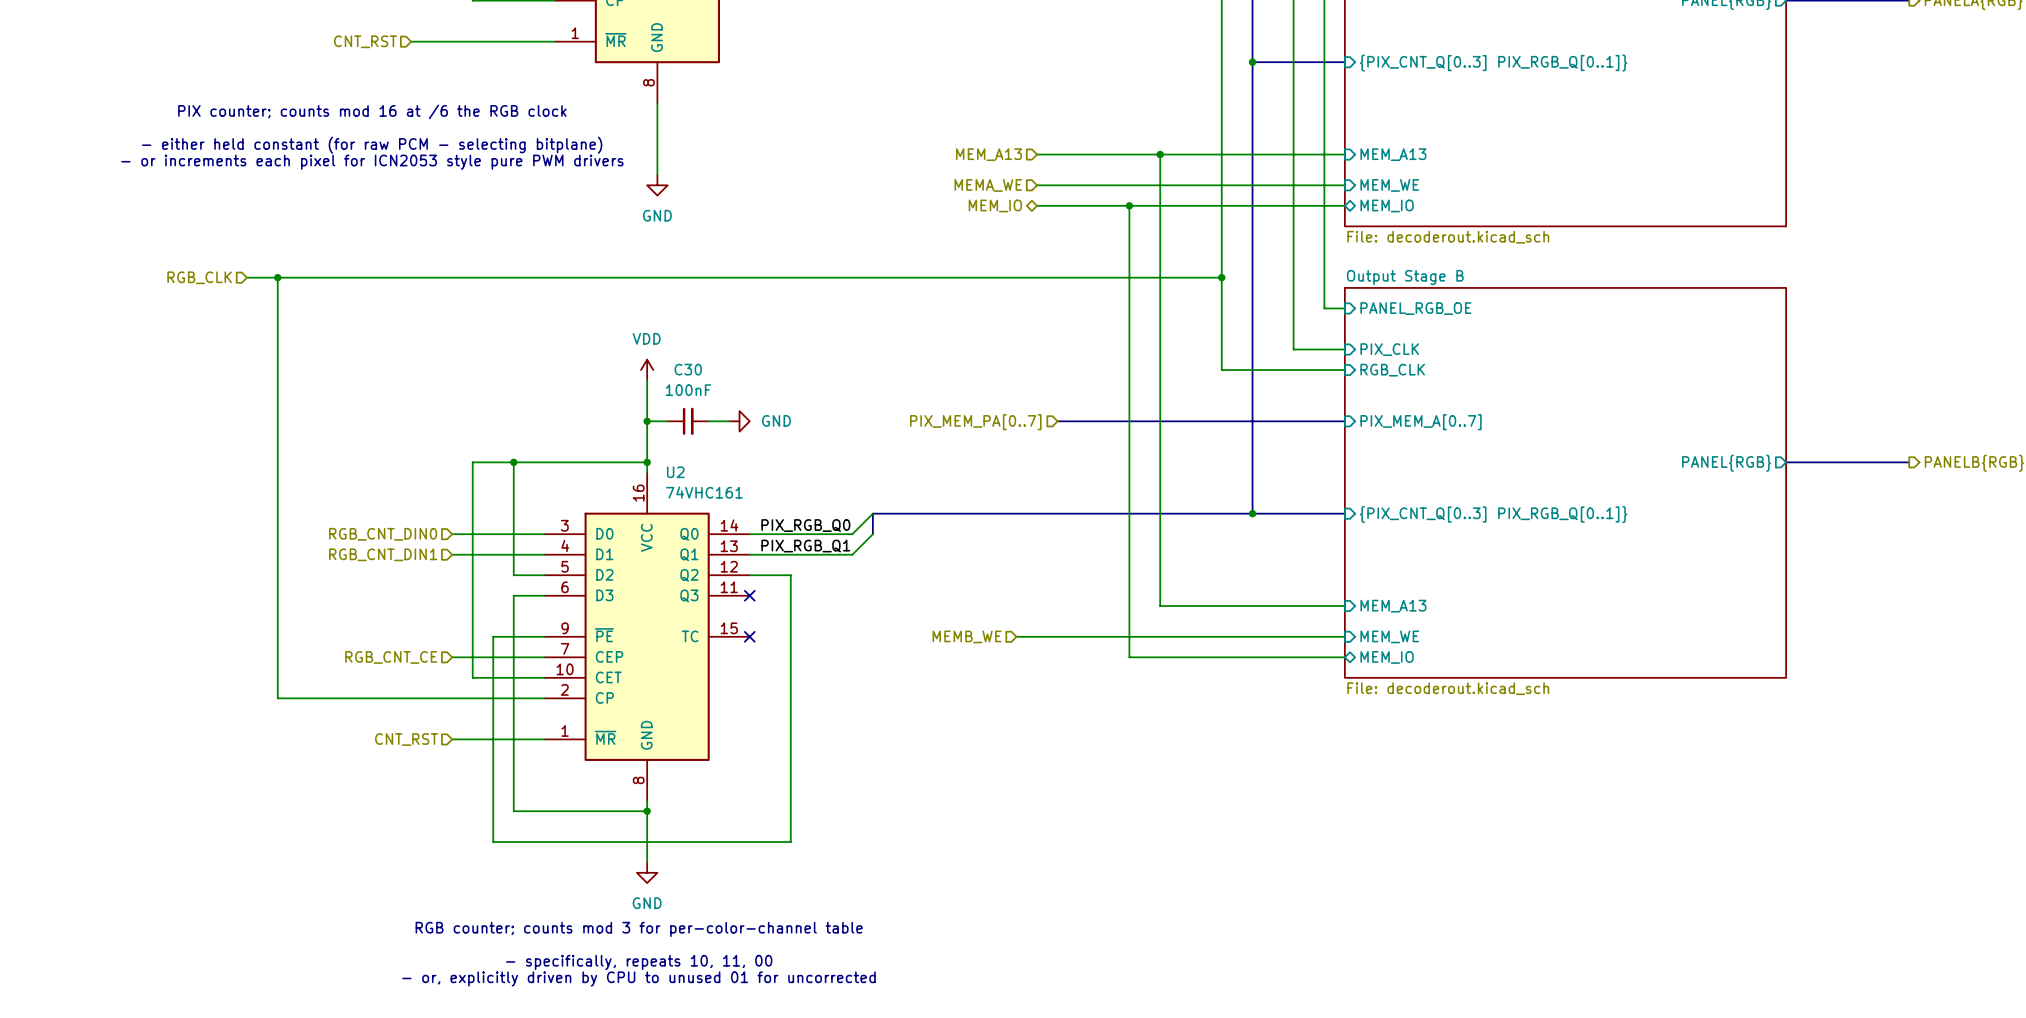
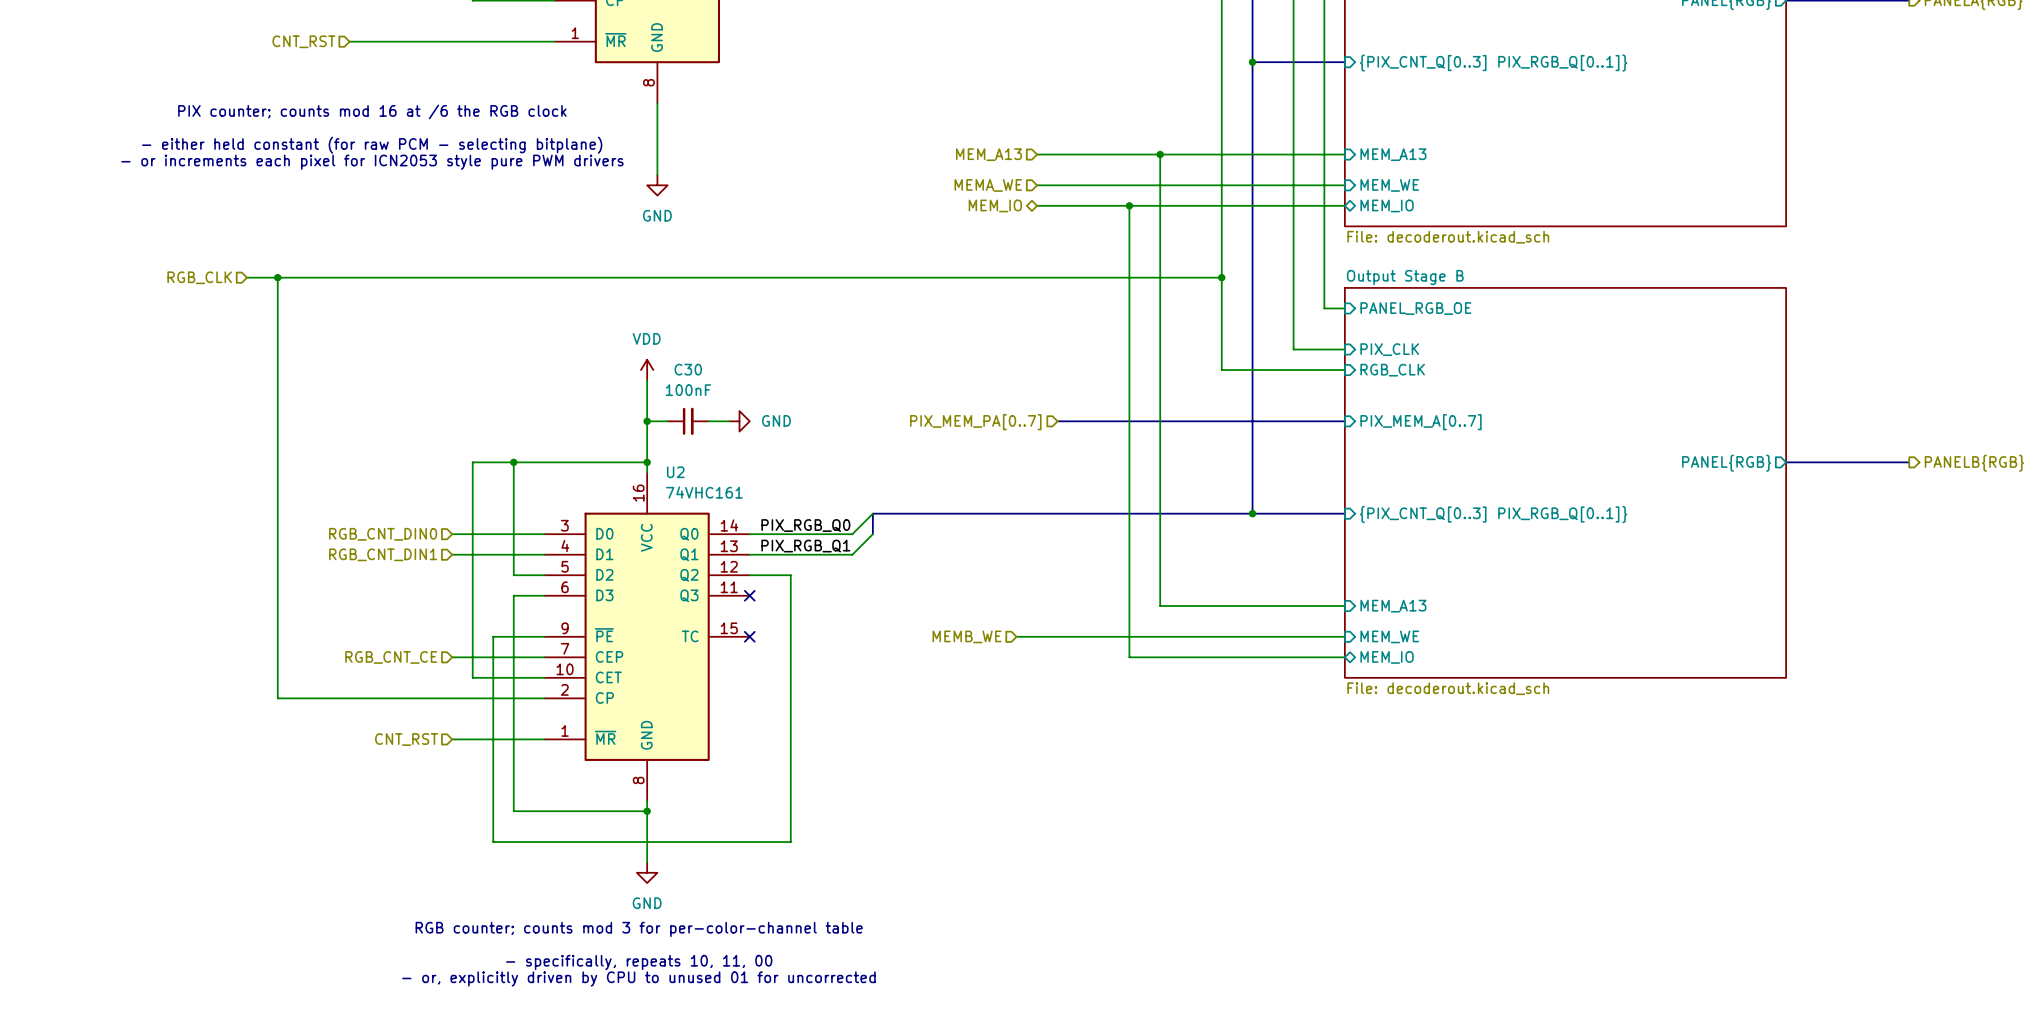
wire: none -> (349, 41) (411, 41)
hierarchical label position: CNT_RST (365, 41) -> CNT_RST (303, 41)

